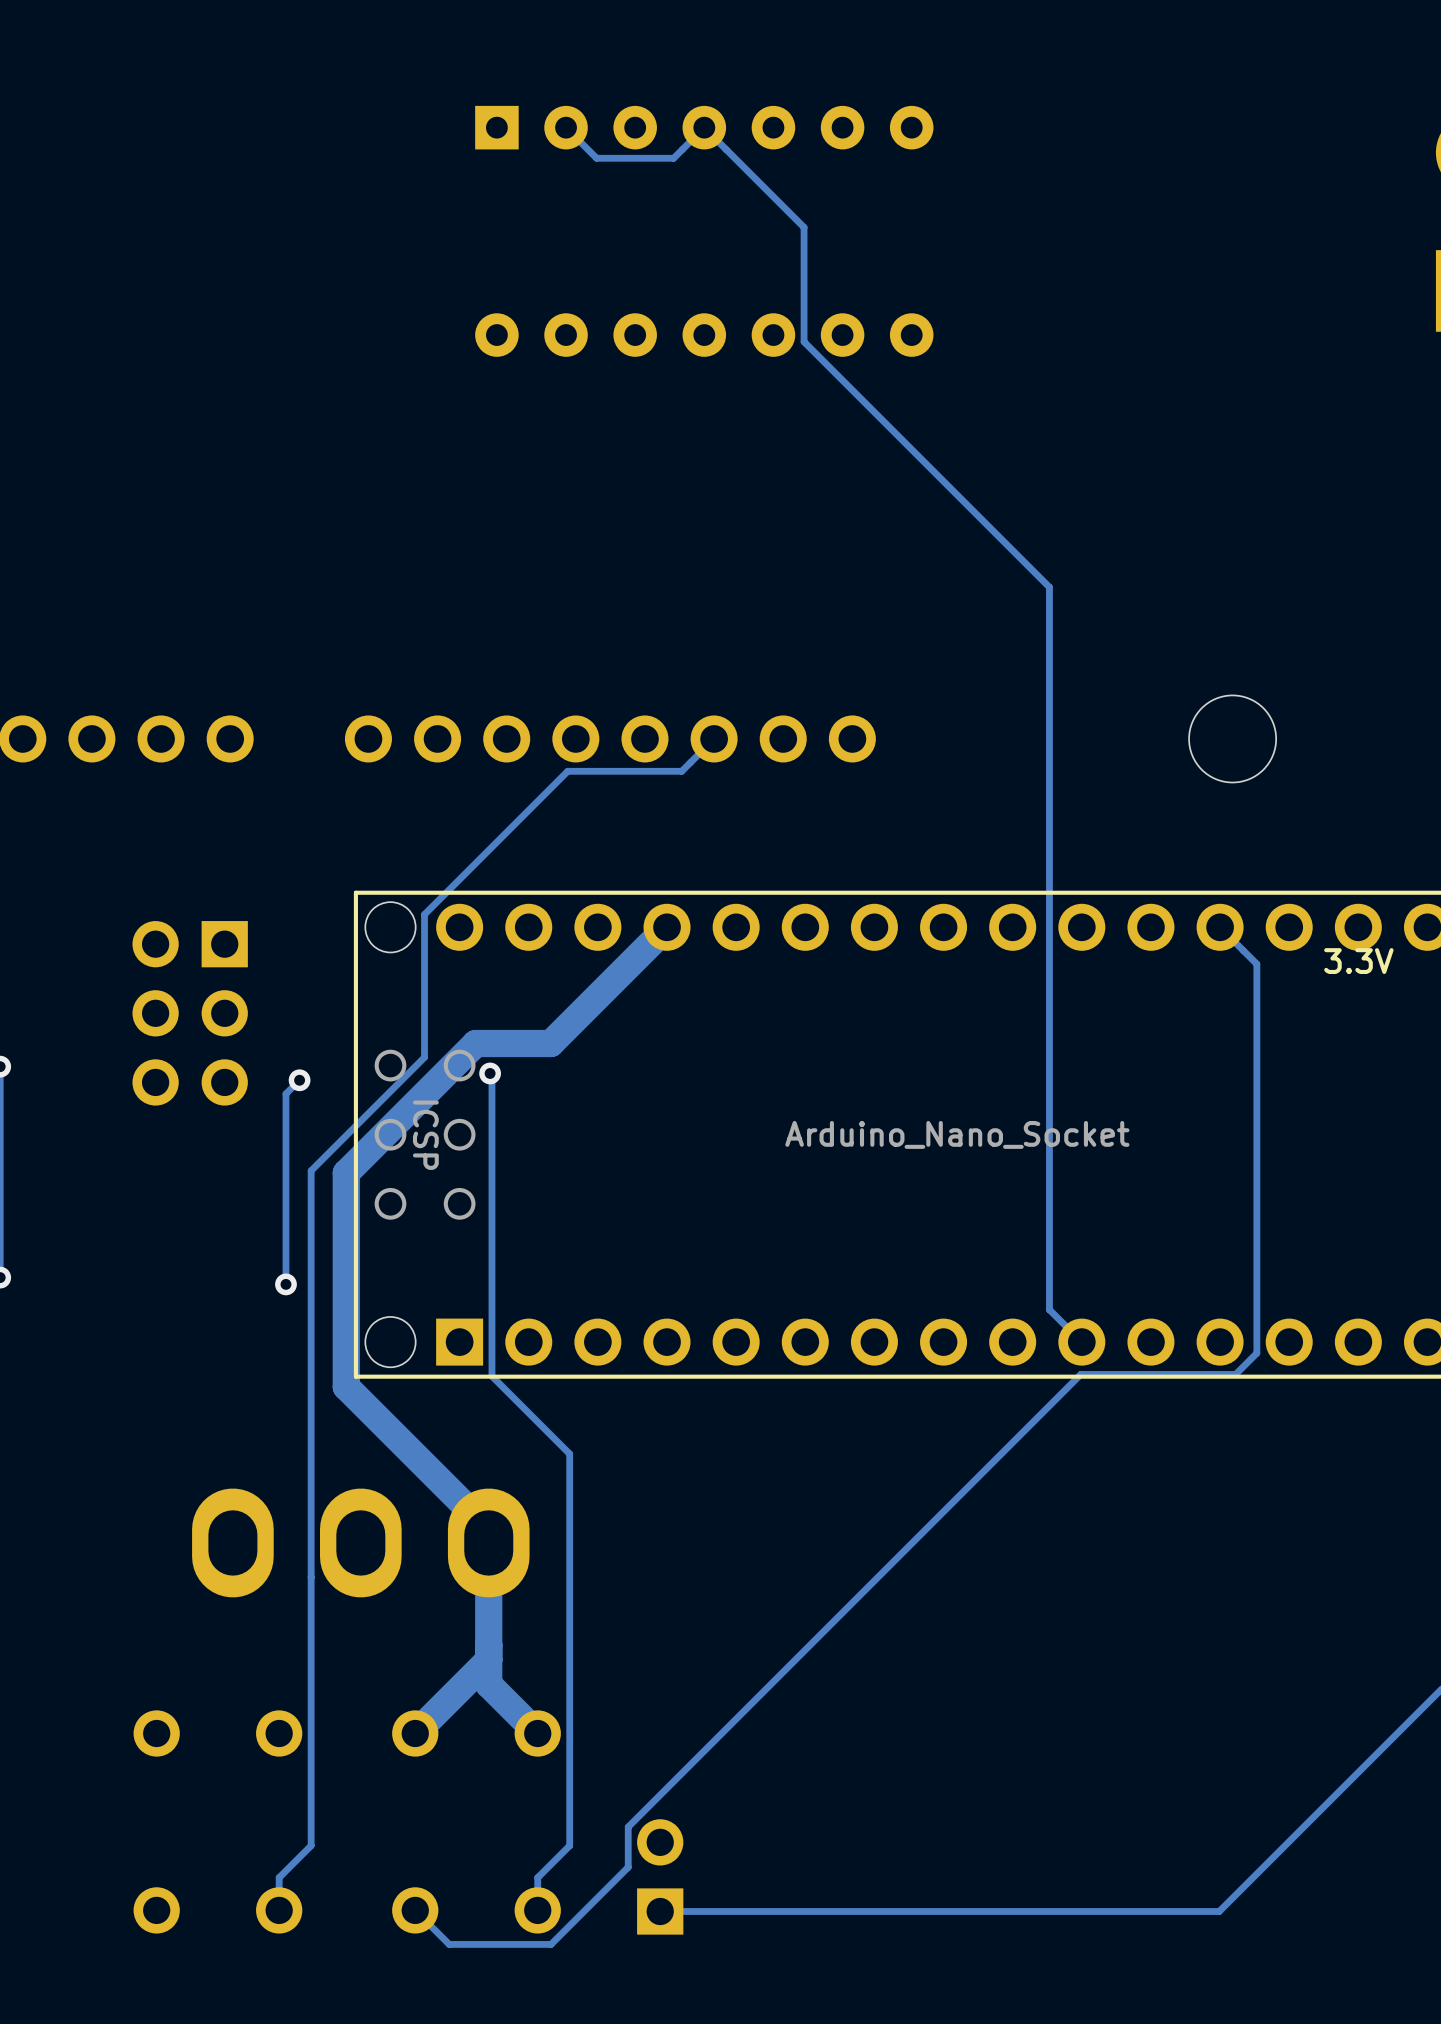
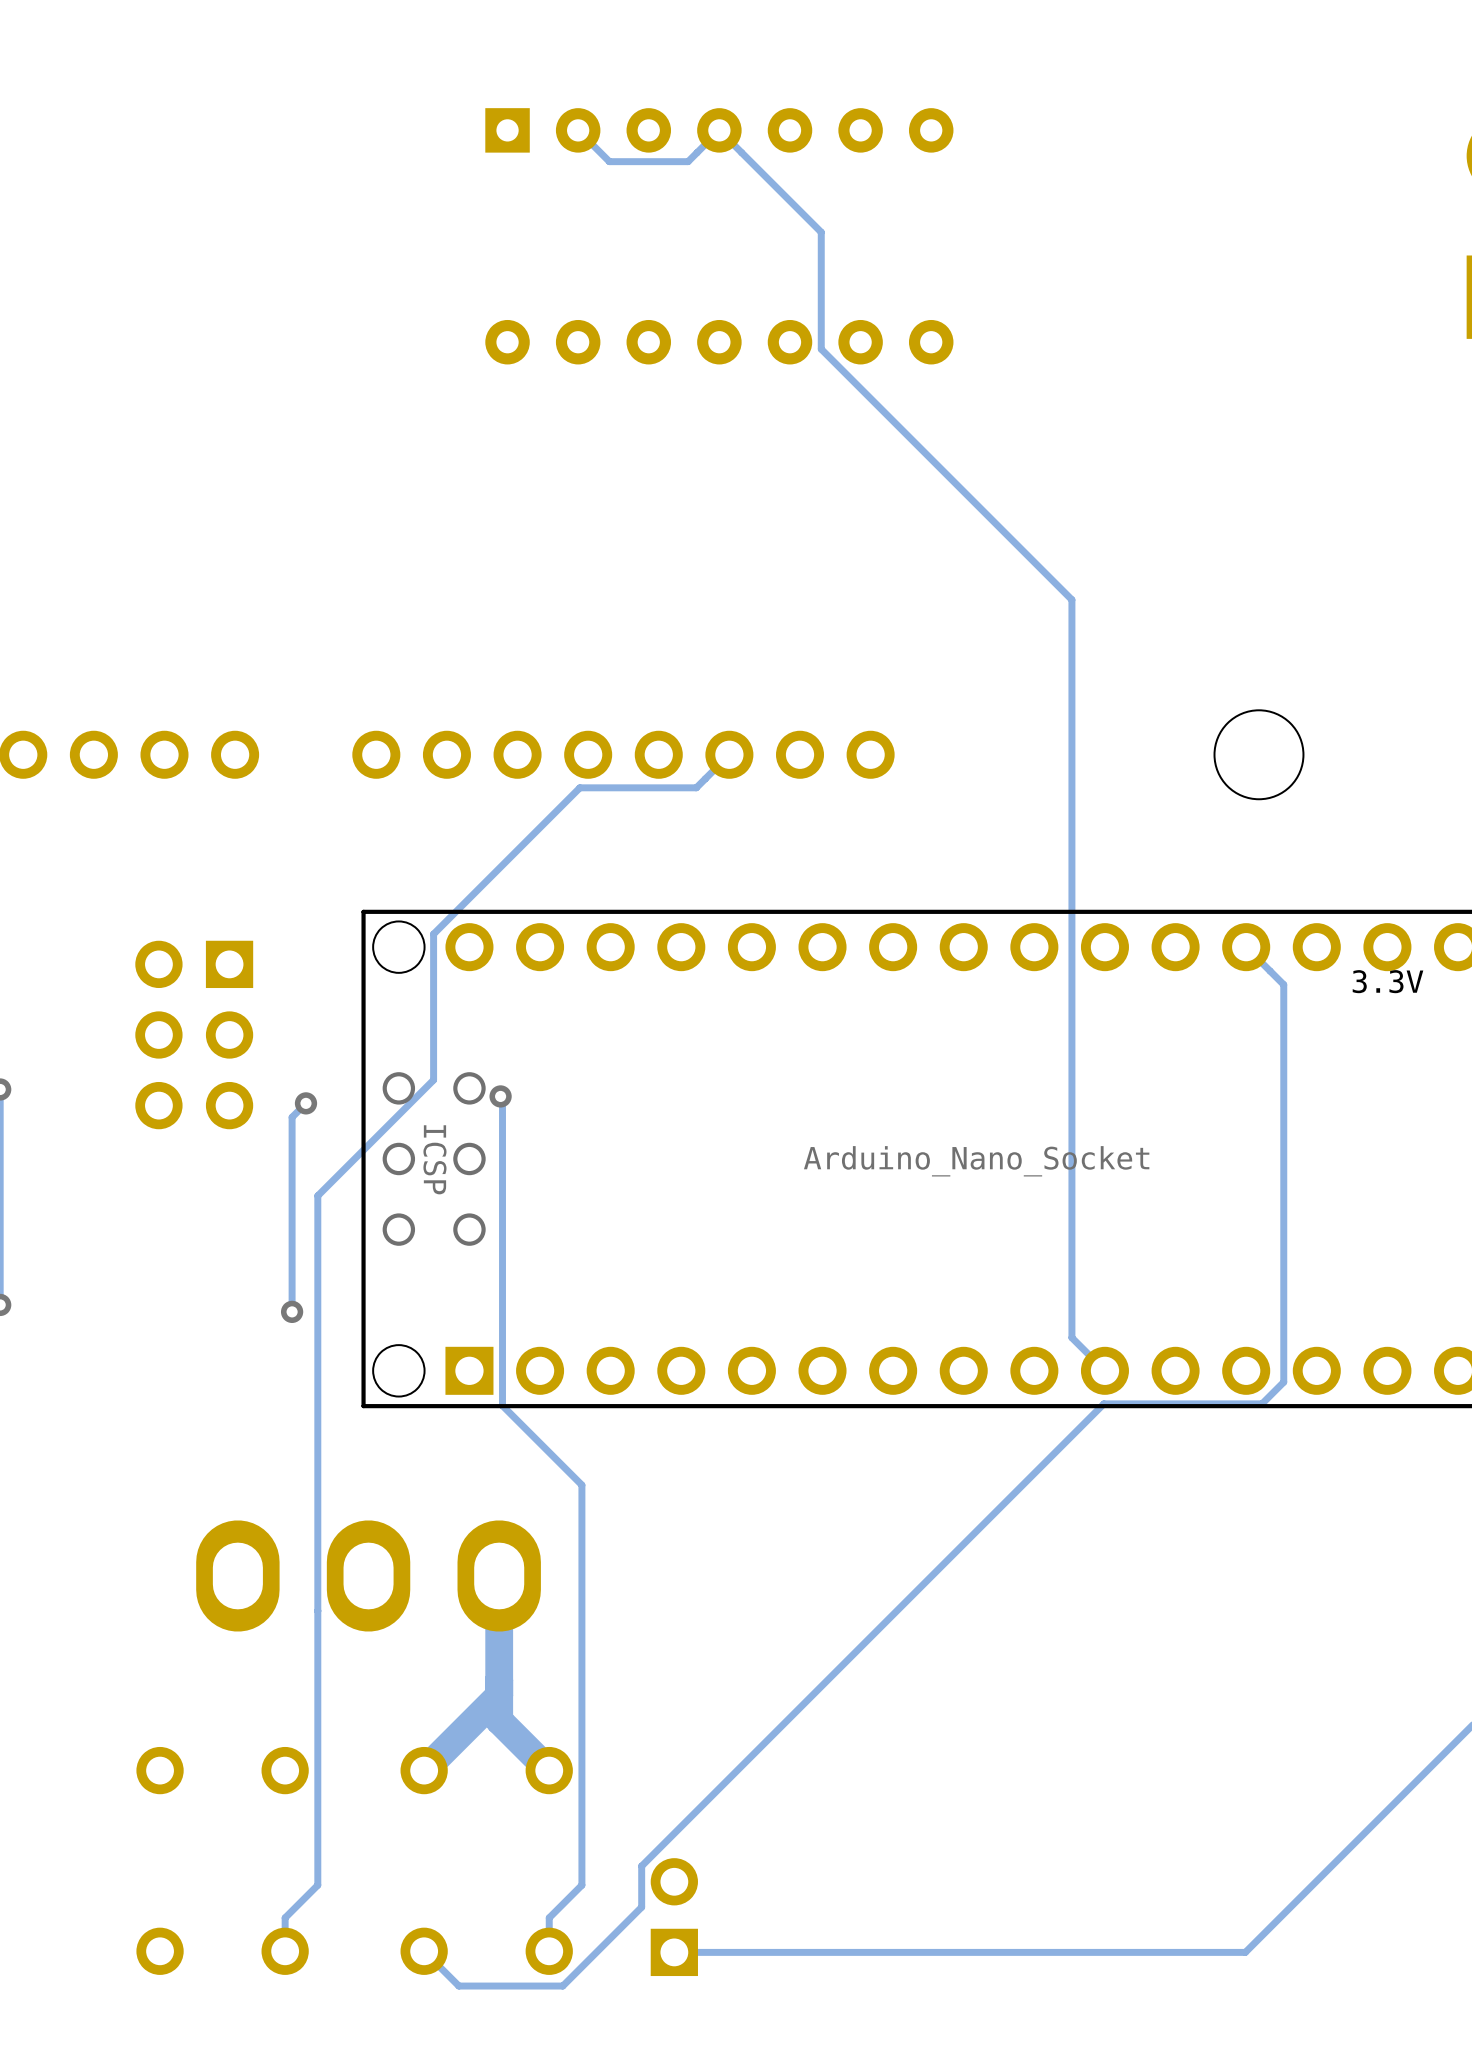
track: (667, 927) (550, 1043) (475, 1043) (346, 1173) (346, 1386) (488, 1529) (488, 1542) -> none

